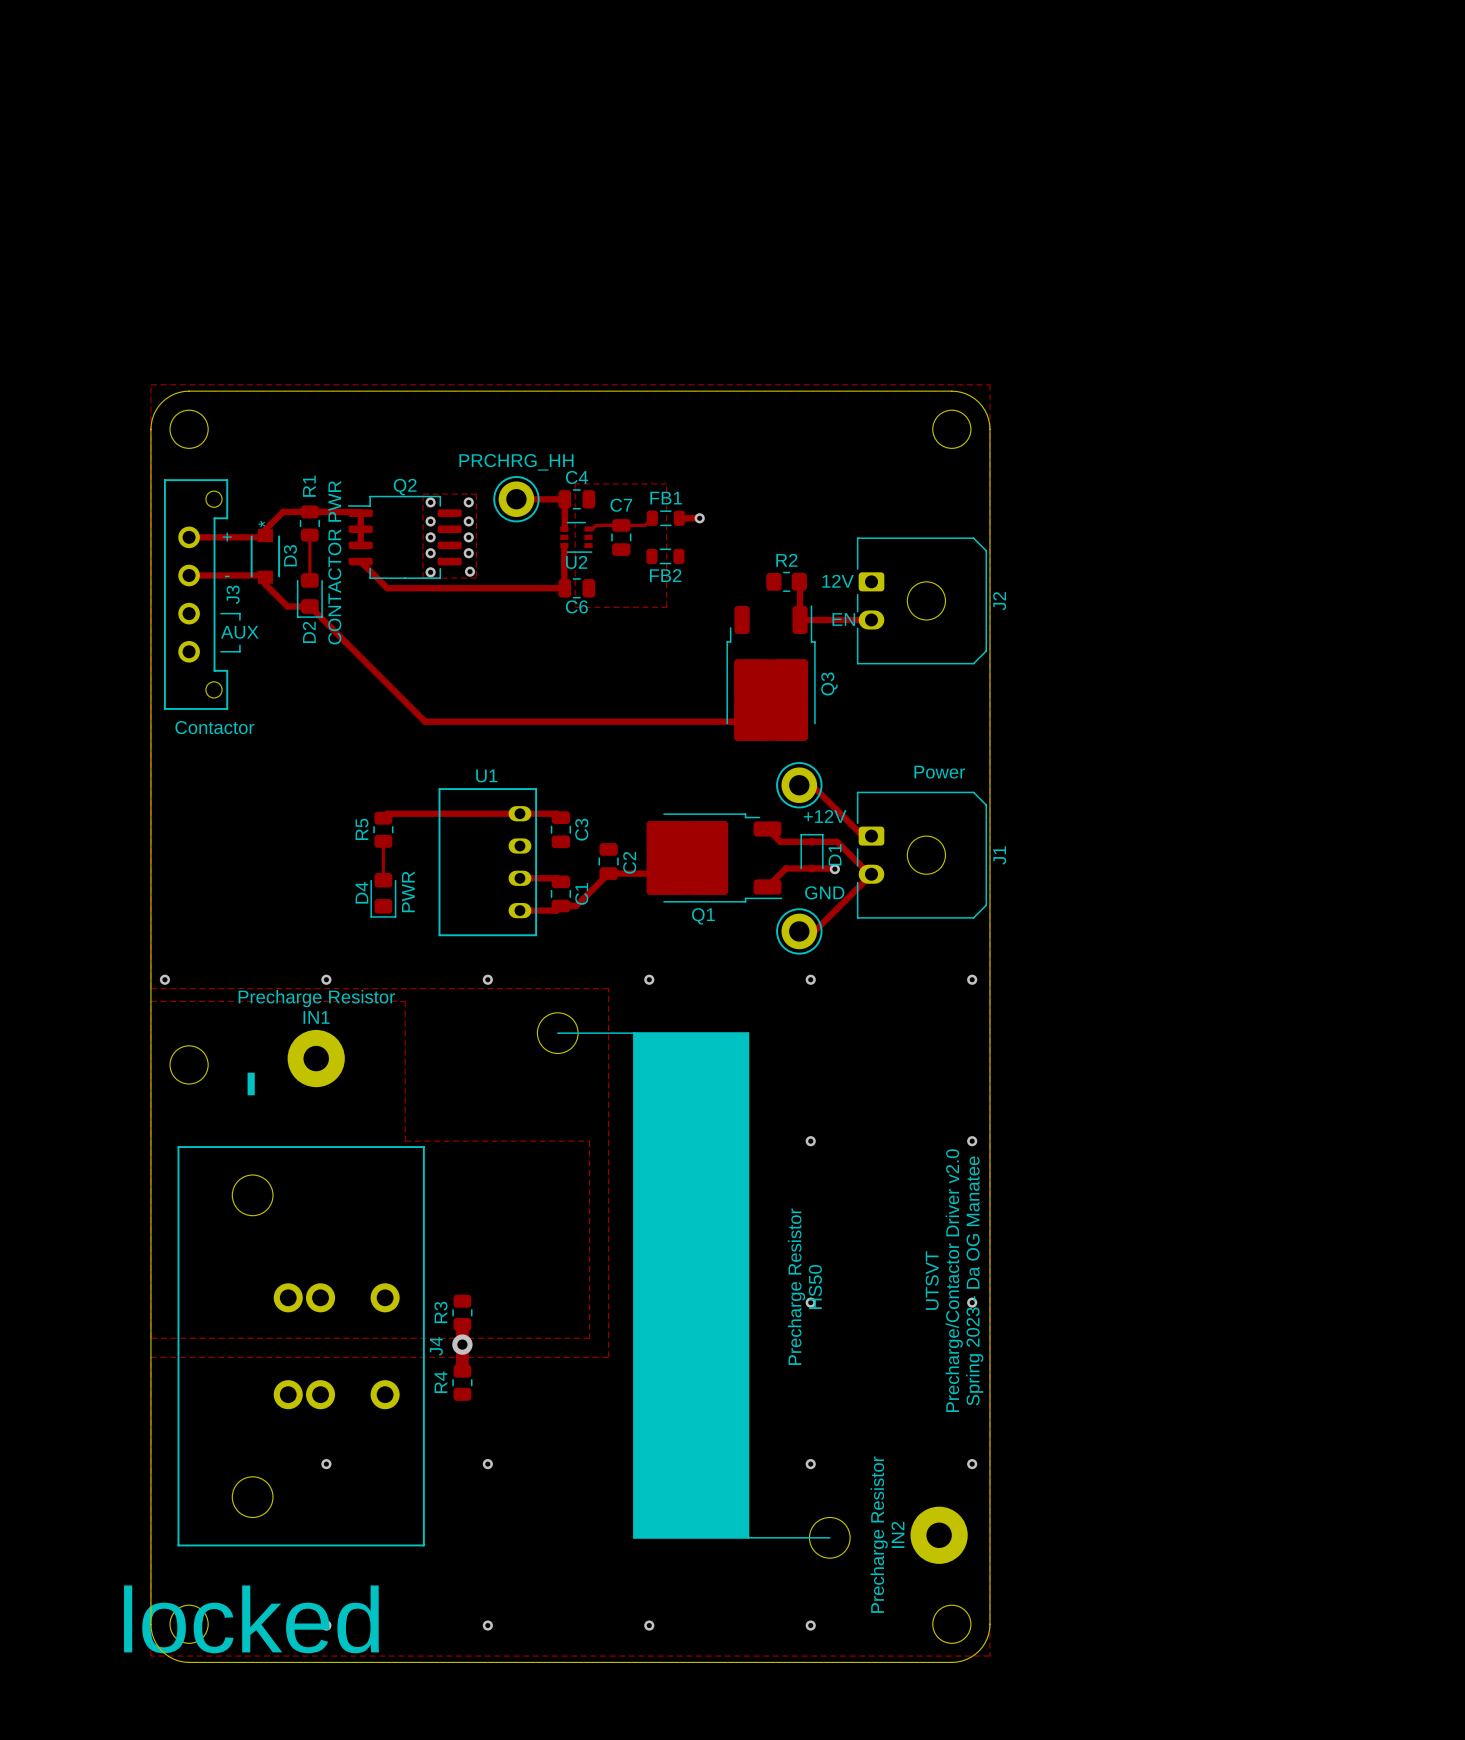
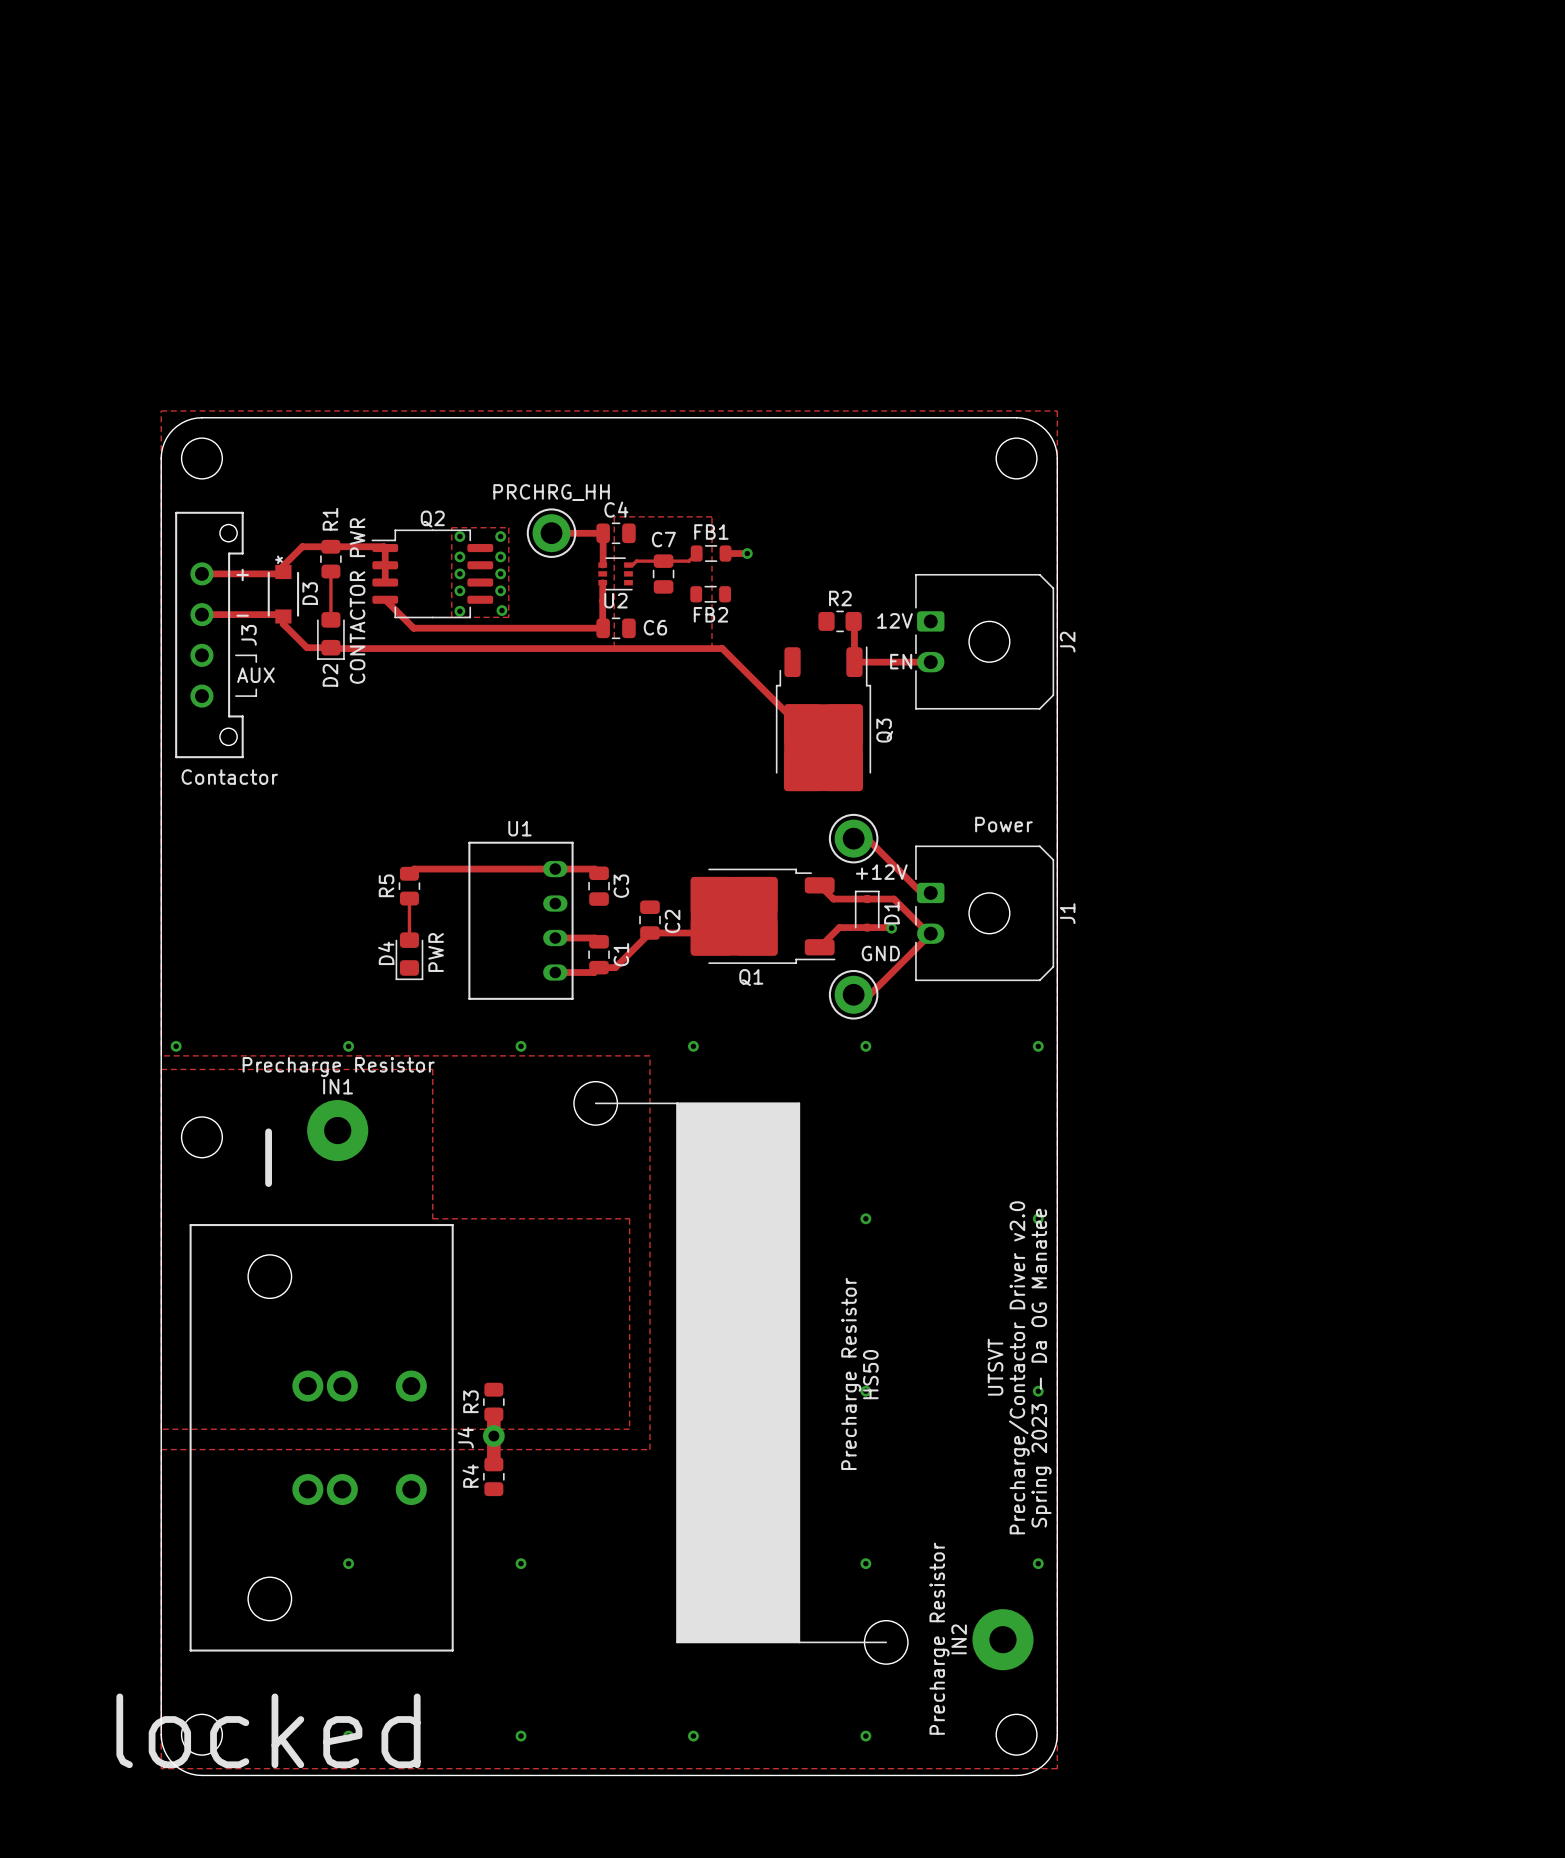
C6 name position: C6 (576, 606) -> C6 (655, 627)
track: (310, 607) (425, 721) (790, 721) -> (331, 648) (722, 648) (844, 770)

